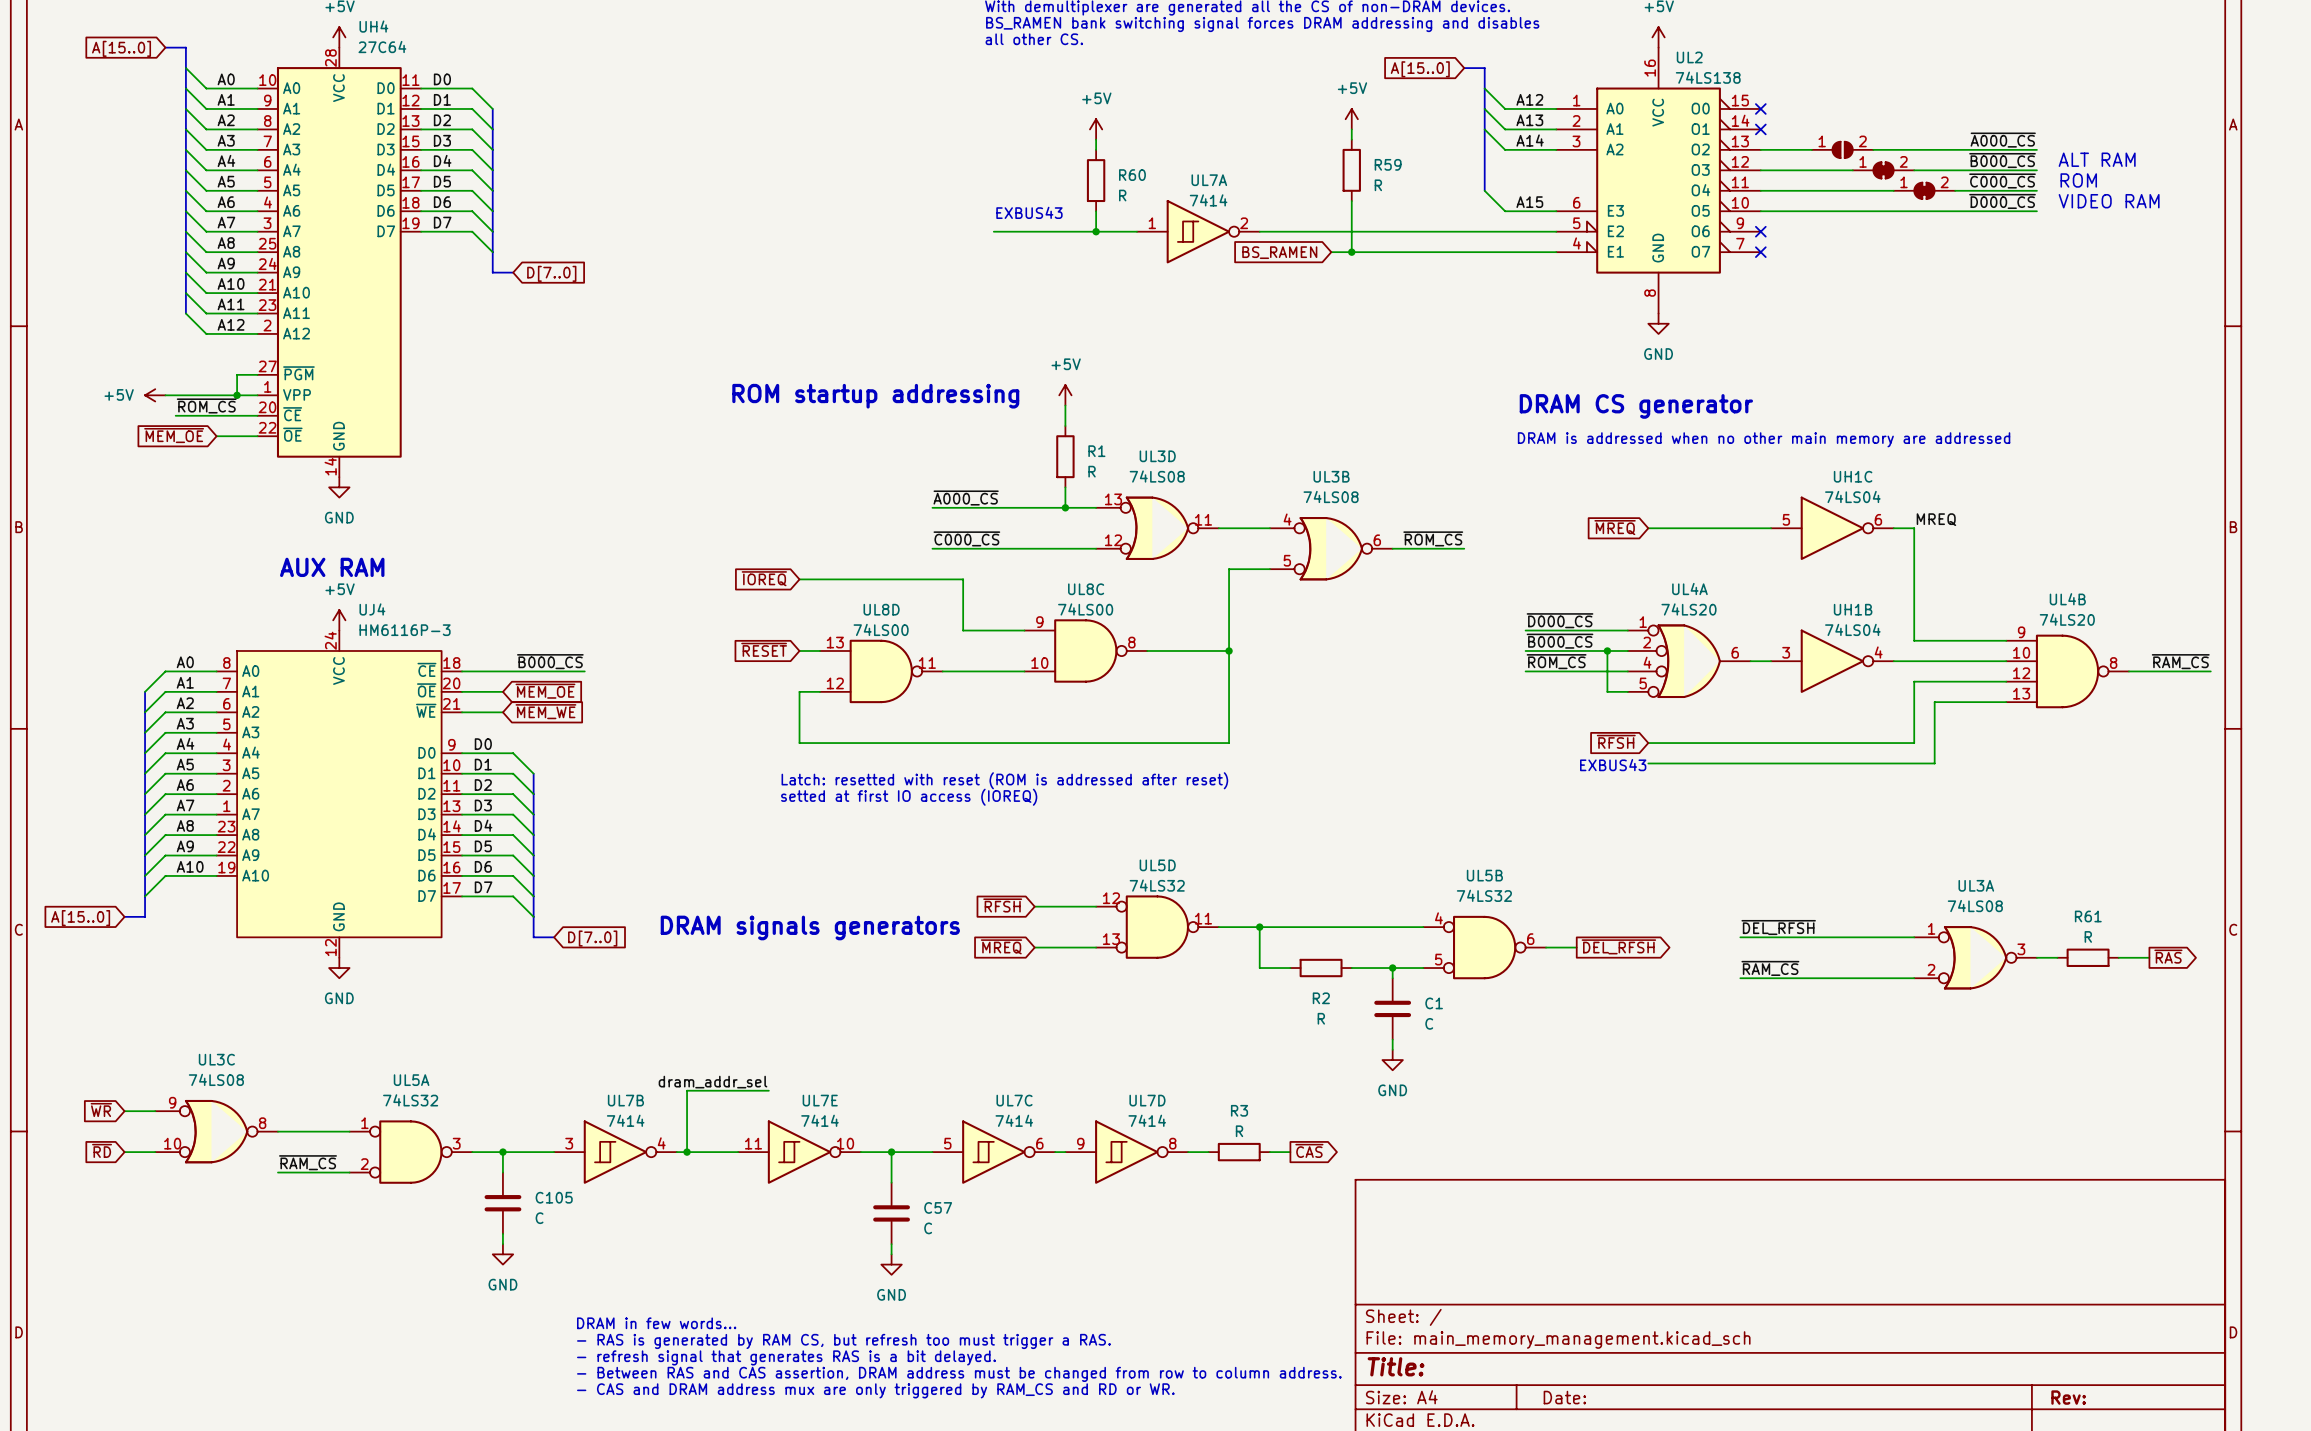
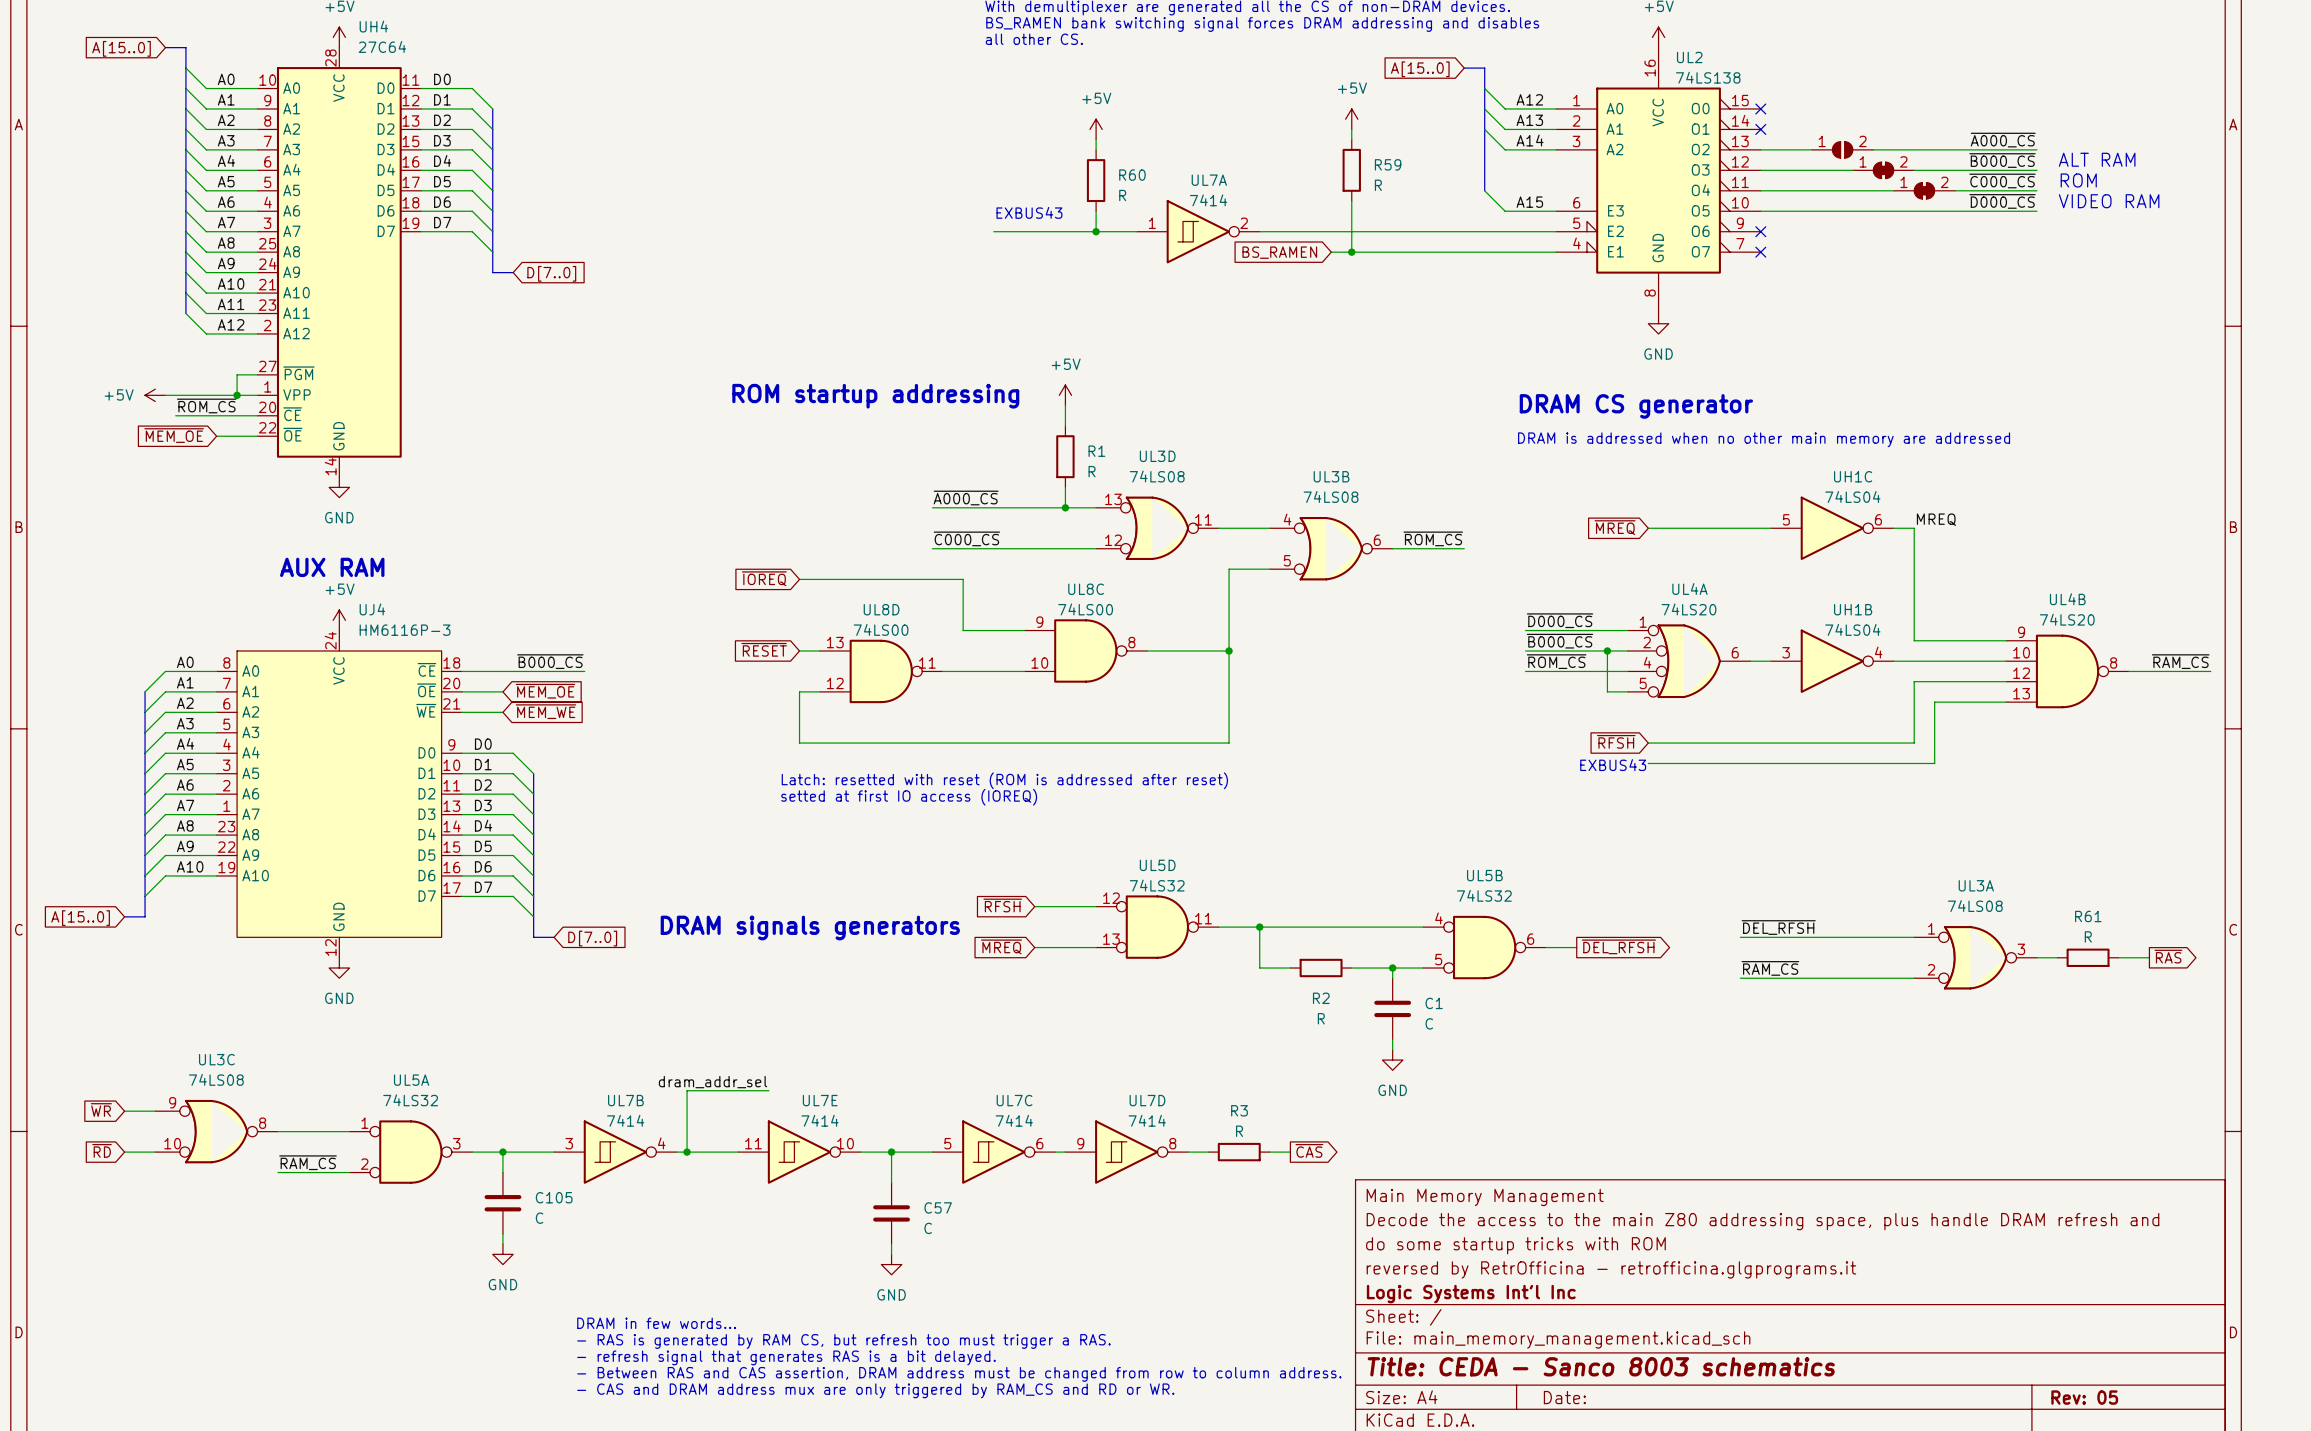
title block: none -> Main Memory Management (1485, 1197)
title block: none -> Decode the access to the main Z80 addressing space, plus handle DRAM refresh and (1762, 1221)
title block: none -> do some startup tricks with ROM (1515, 1245)
title block: none -> reversed by RetrOfficina - retrofficina.glgprograms.it (1611, 1269)
title block: none -> Logic Systems Int'l Inc (1471, 1294)
title block: Title: (1396, 1366) -> Title: CEDA - Sanco 8003 schematics (1601, 1366)
title block: Rev: (2068, 1397) -> Rev: 05 (2084, 1397)

